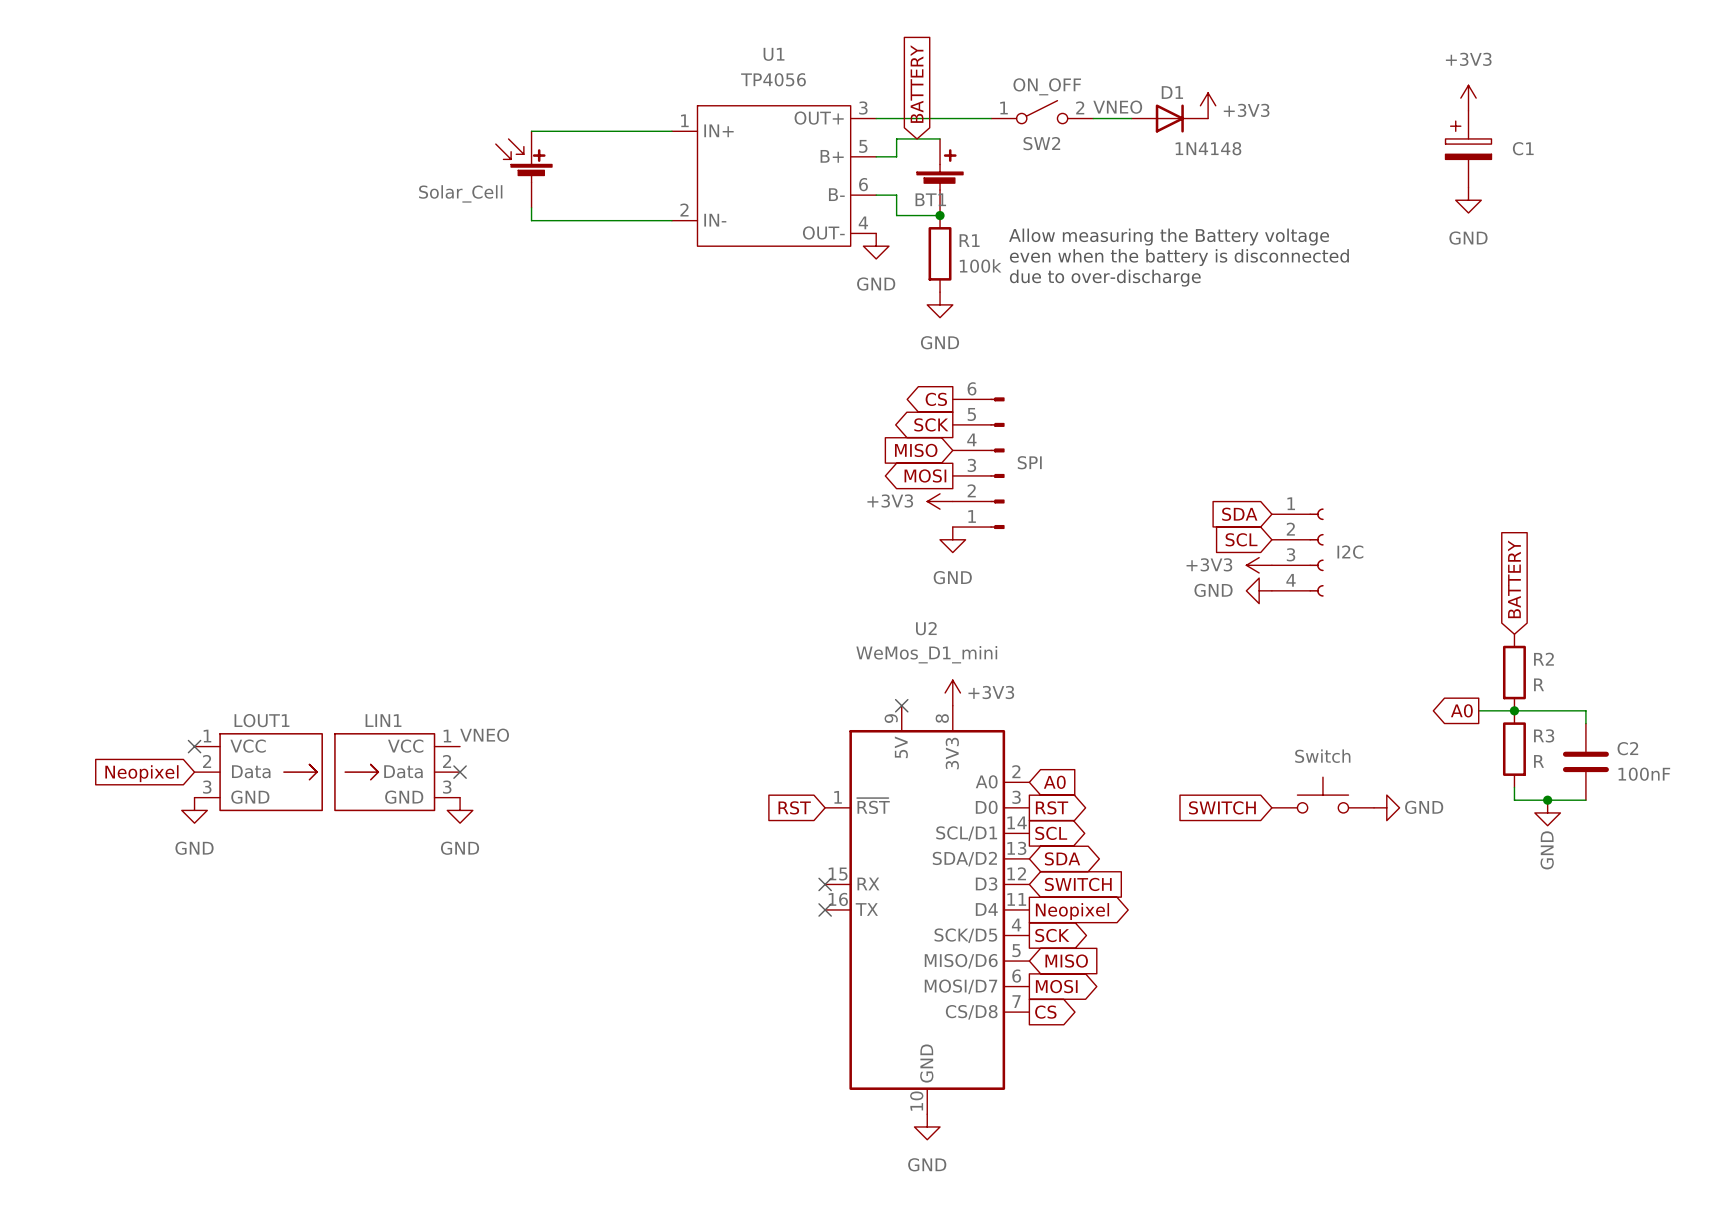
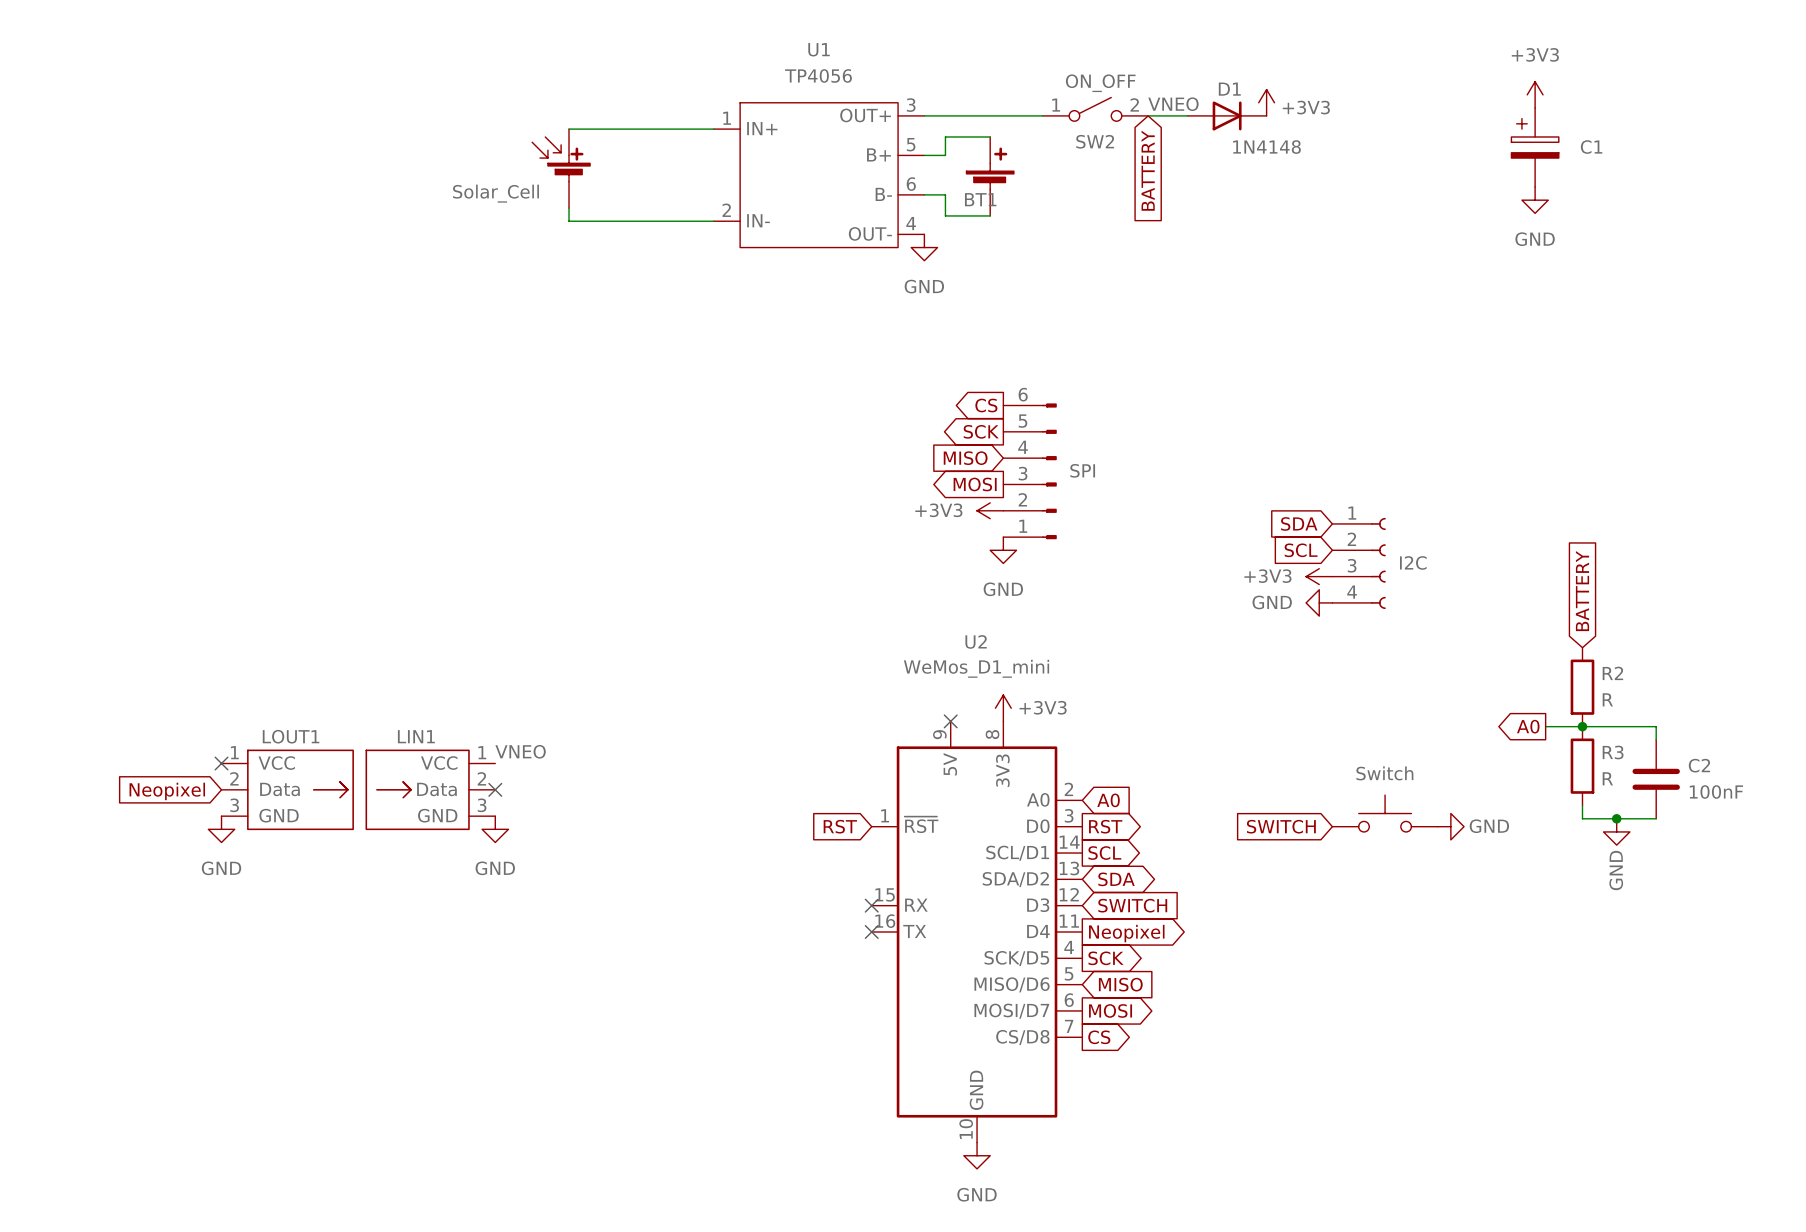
global label rotation: 0° (917, 84) -> 180° (1148, 170)
global label position: BATTERY (917, 84) -> BATTERY (1148, 170)
junction: (940, 215) -> none
text: Allow measuring the Battery voltage (1169, 237) -> none
R1: 100k (940, 253) -> none
text: even when the battery is disconnected (1179, 257) -> none
text: due to over-discharge (1105, 278) -> none
power symbol: GND (940, 304) -> none

